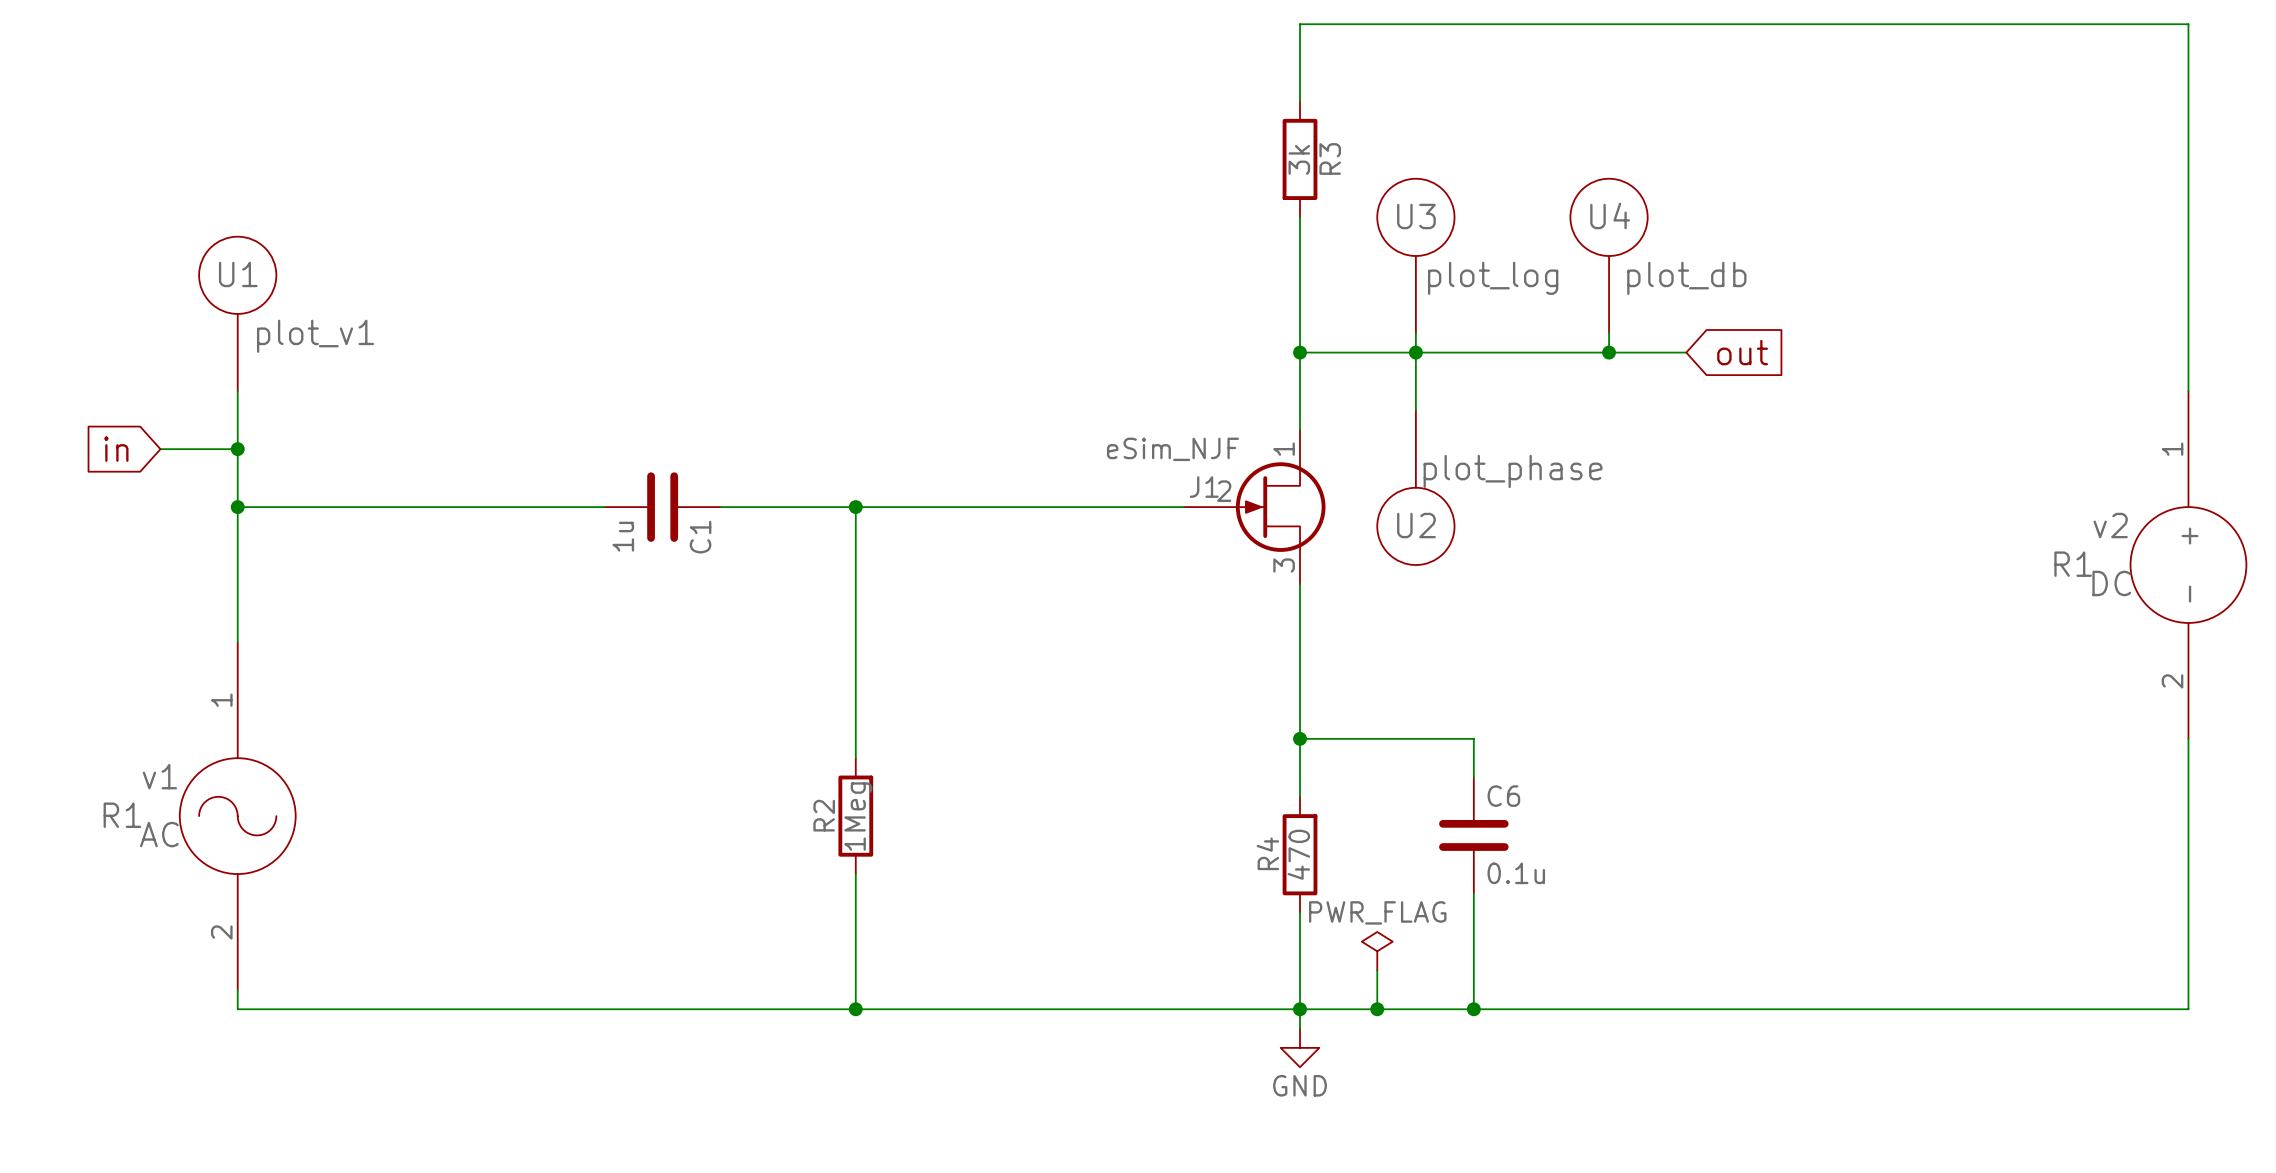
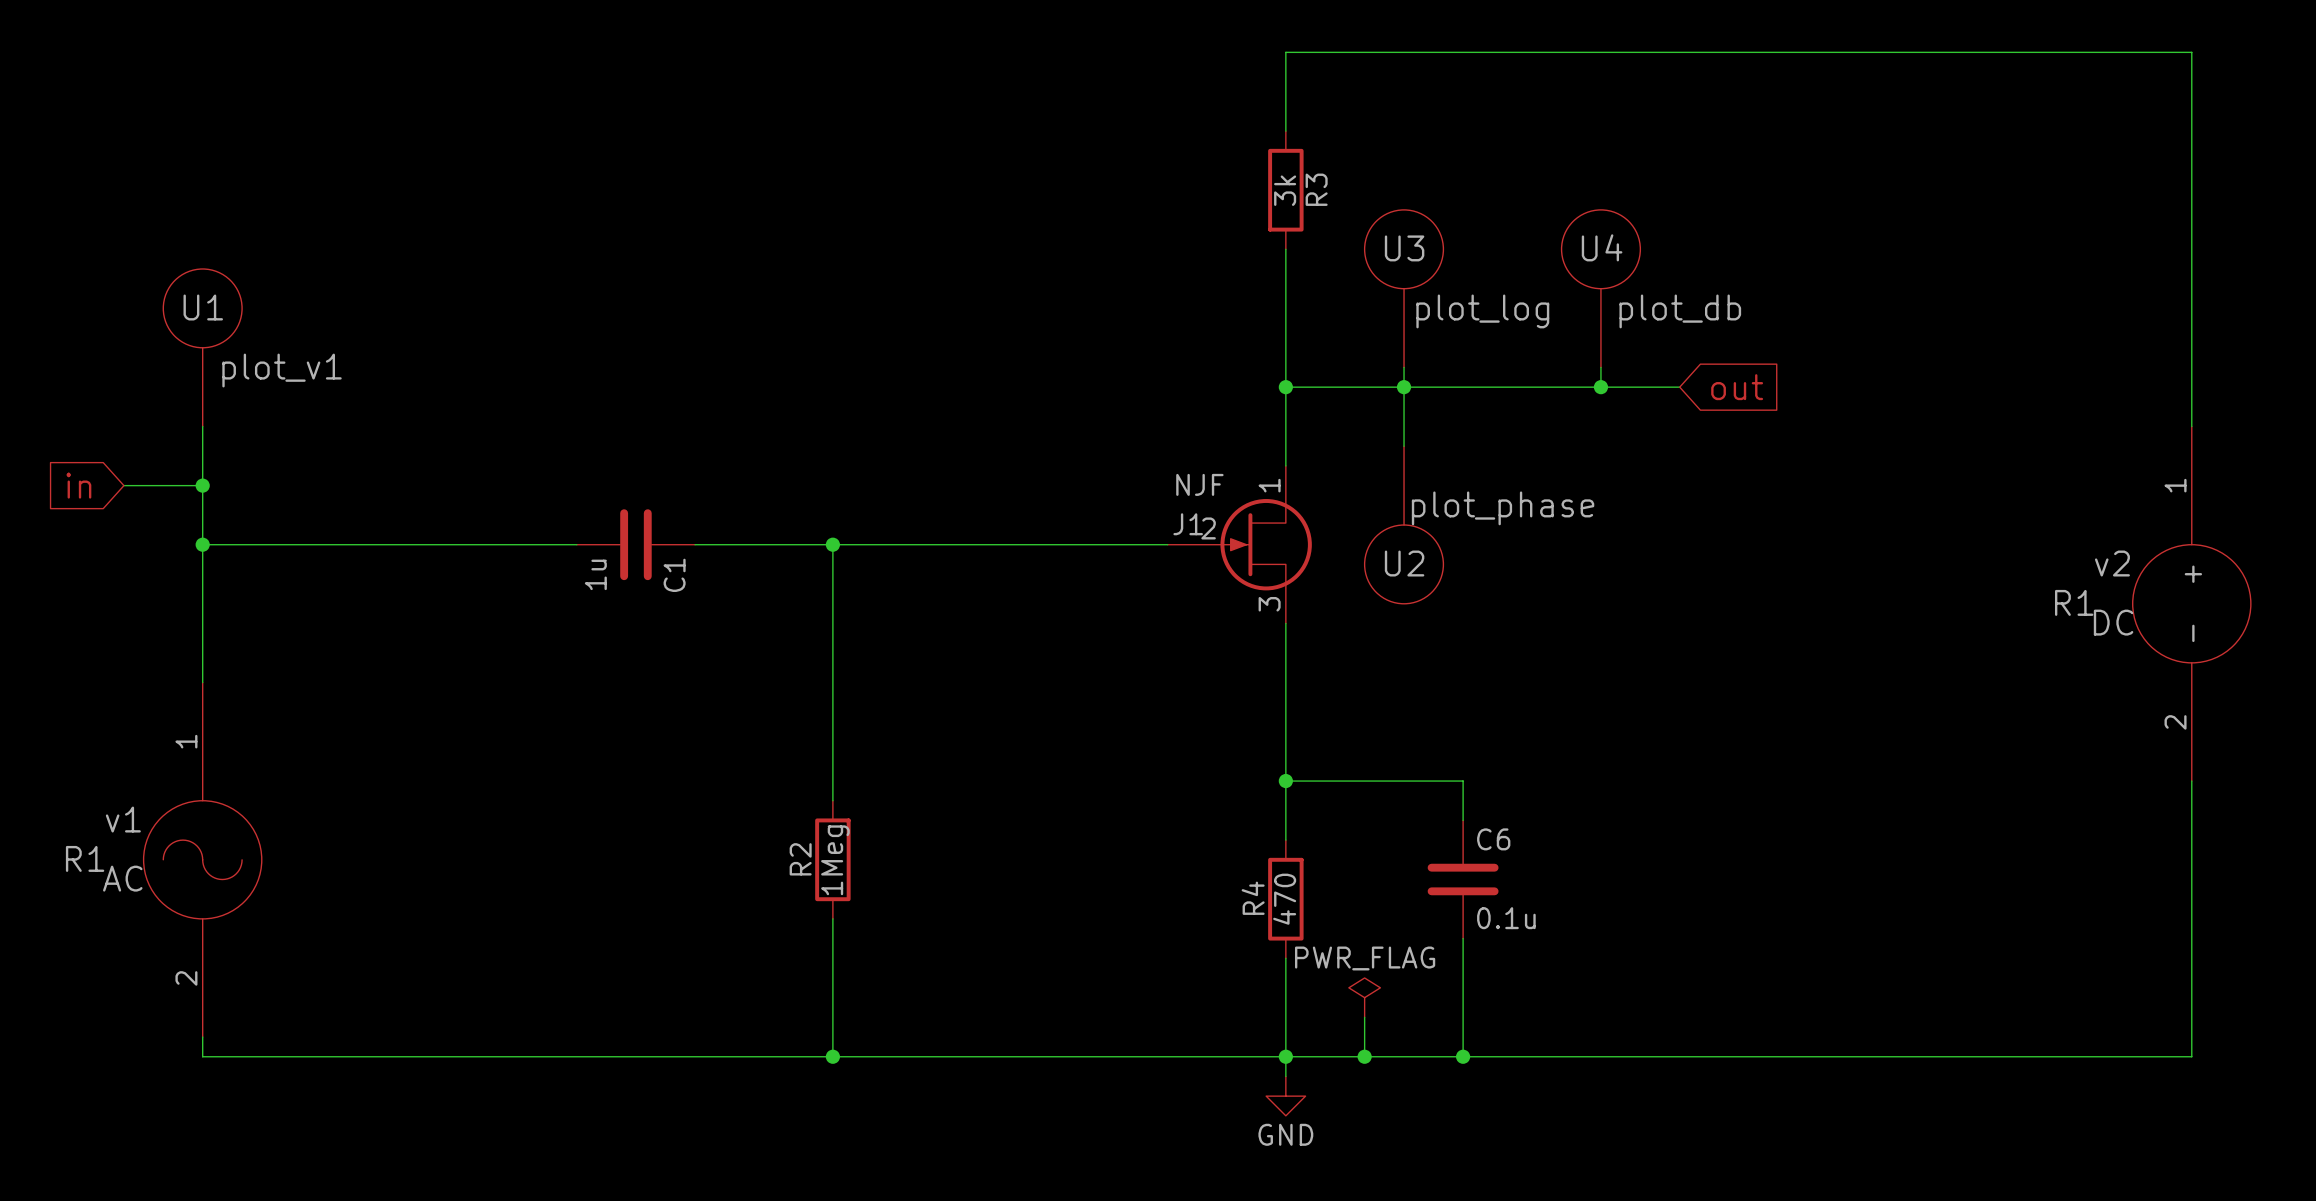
J1 value: eSim_NJF (1172, 449) -> NJF (1199, 484)

